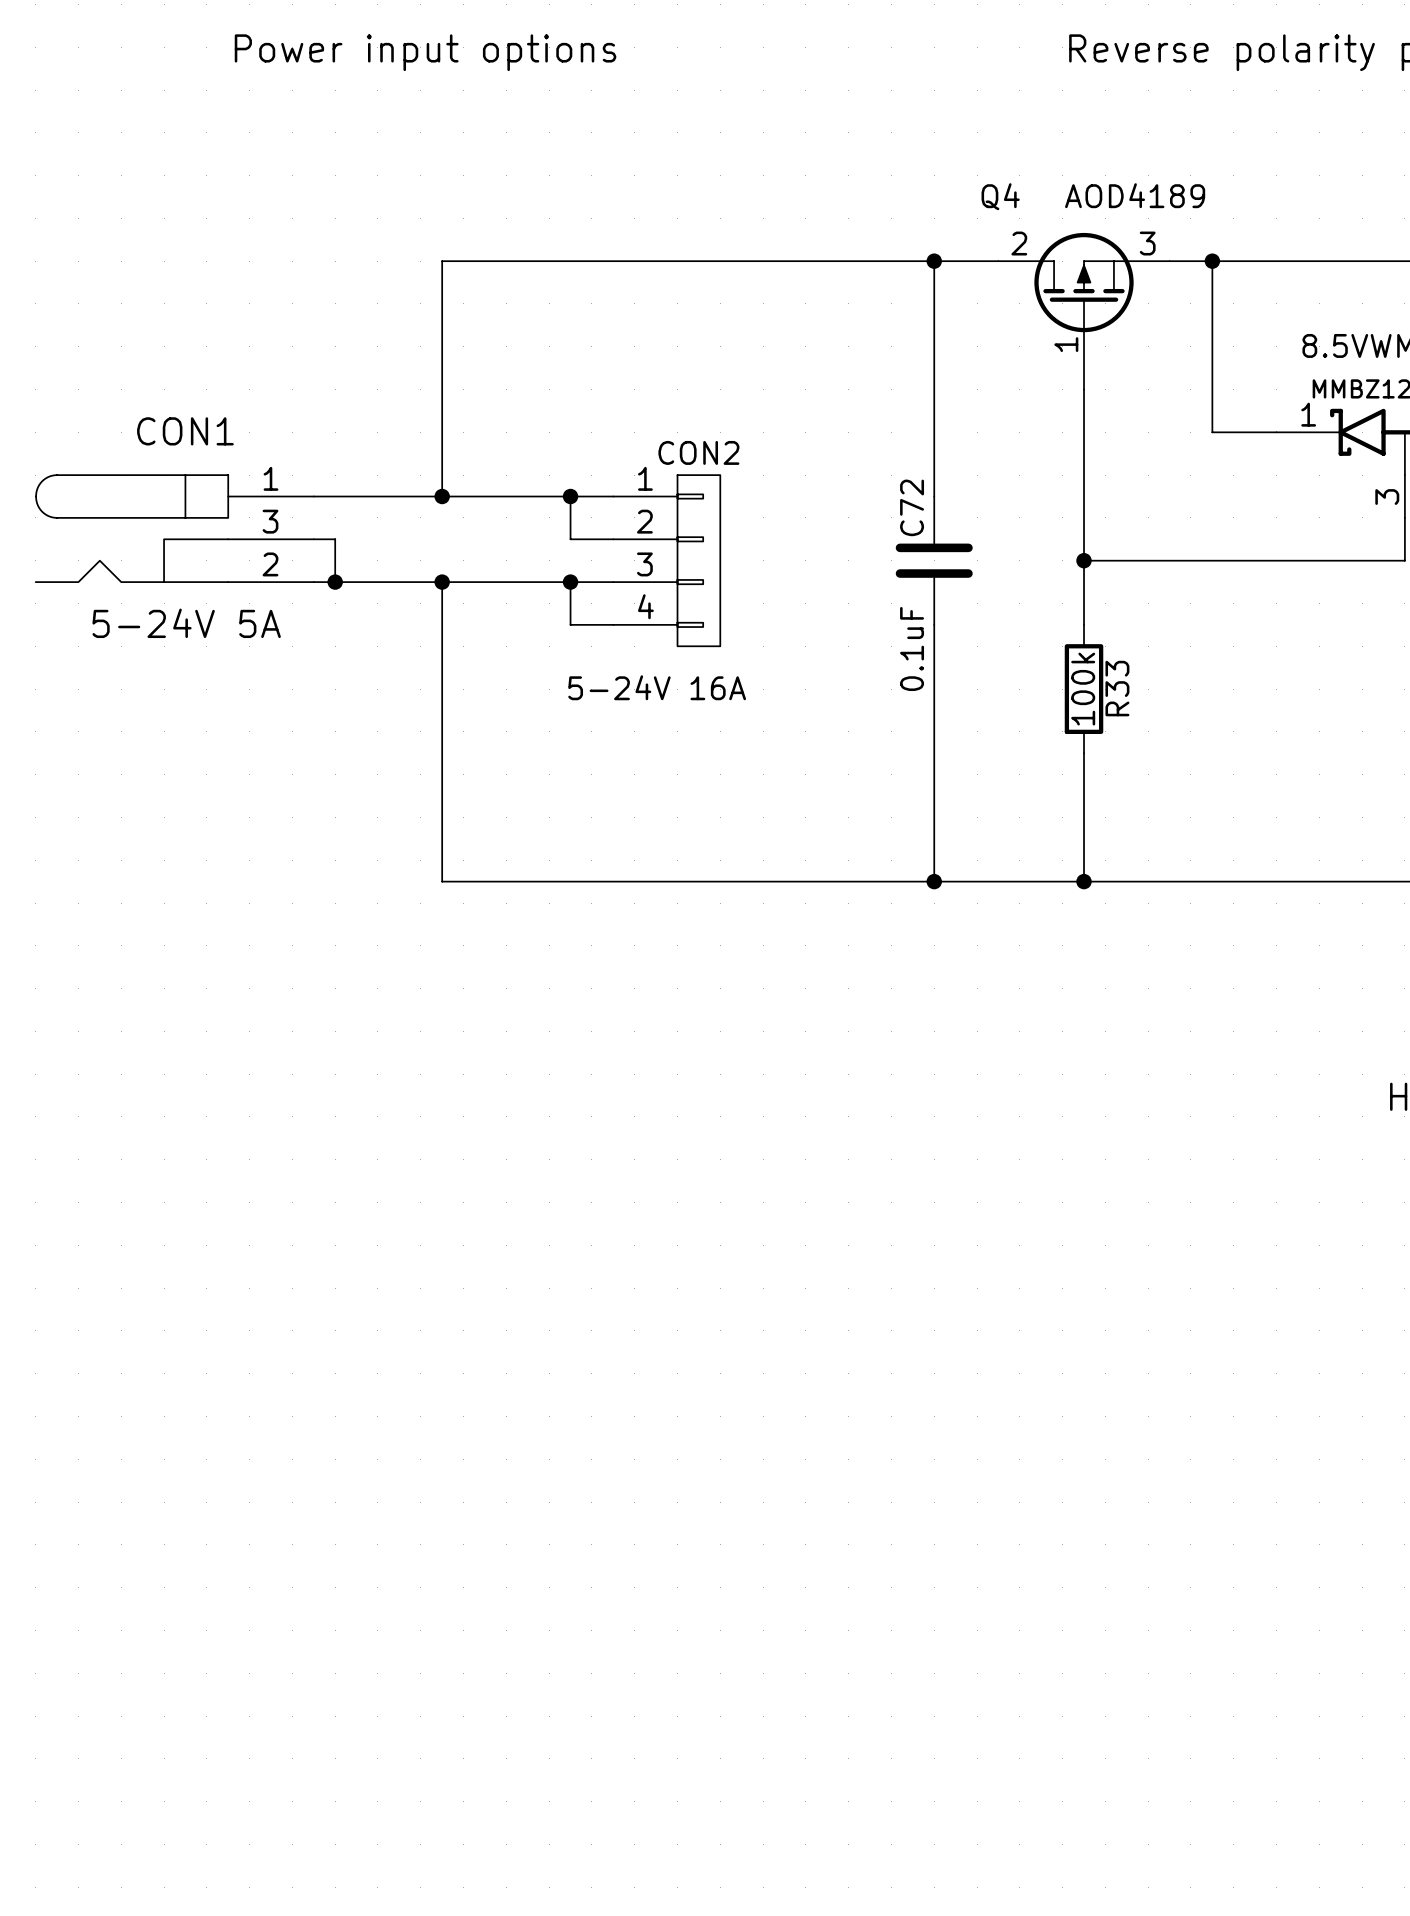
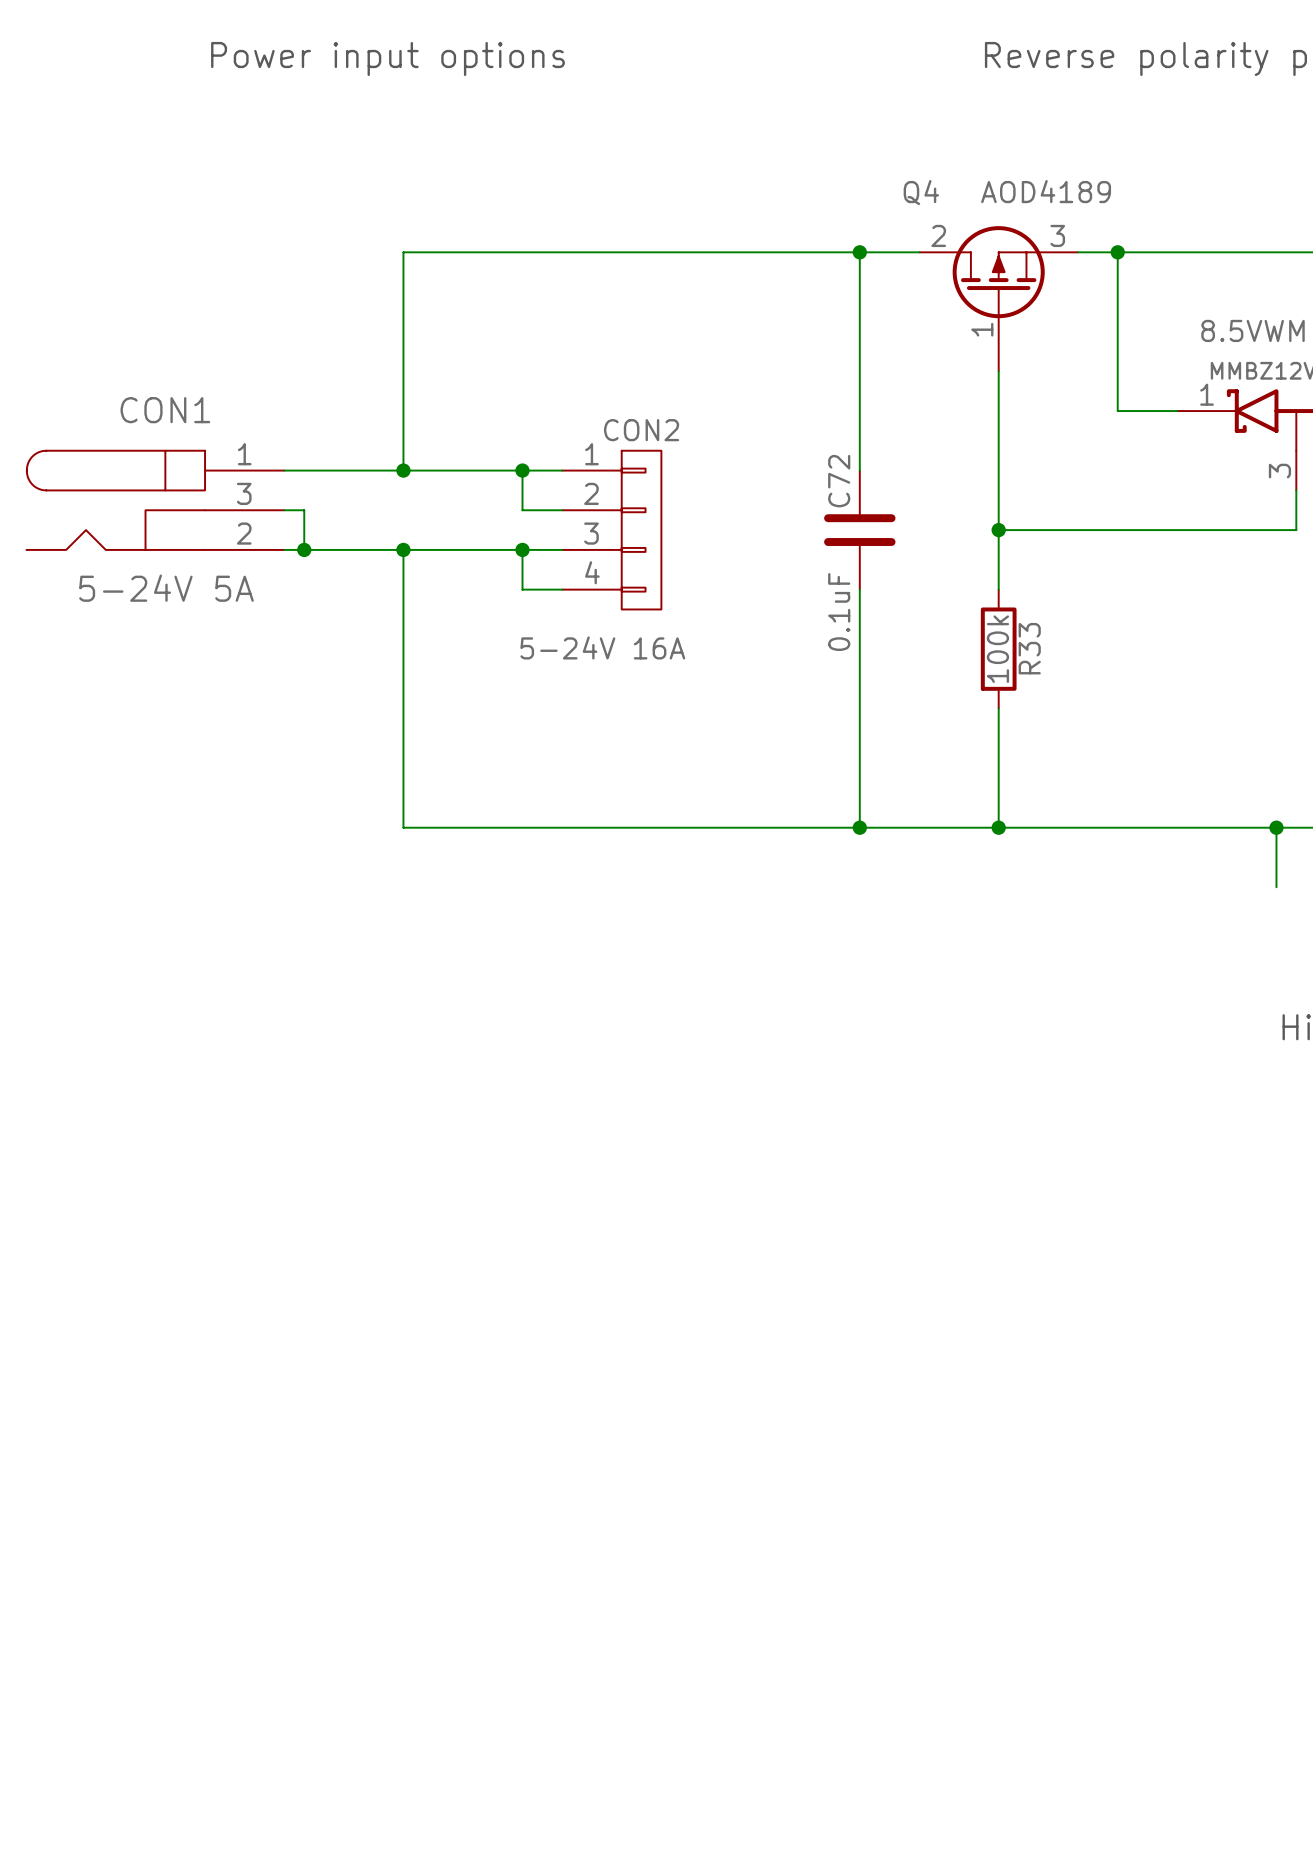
wire: none -> (1276, 827) (1276, 887)
junction: none -> (1276, 827)

